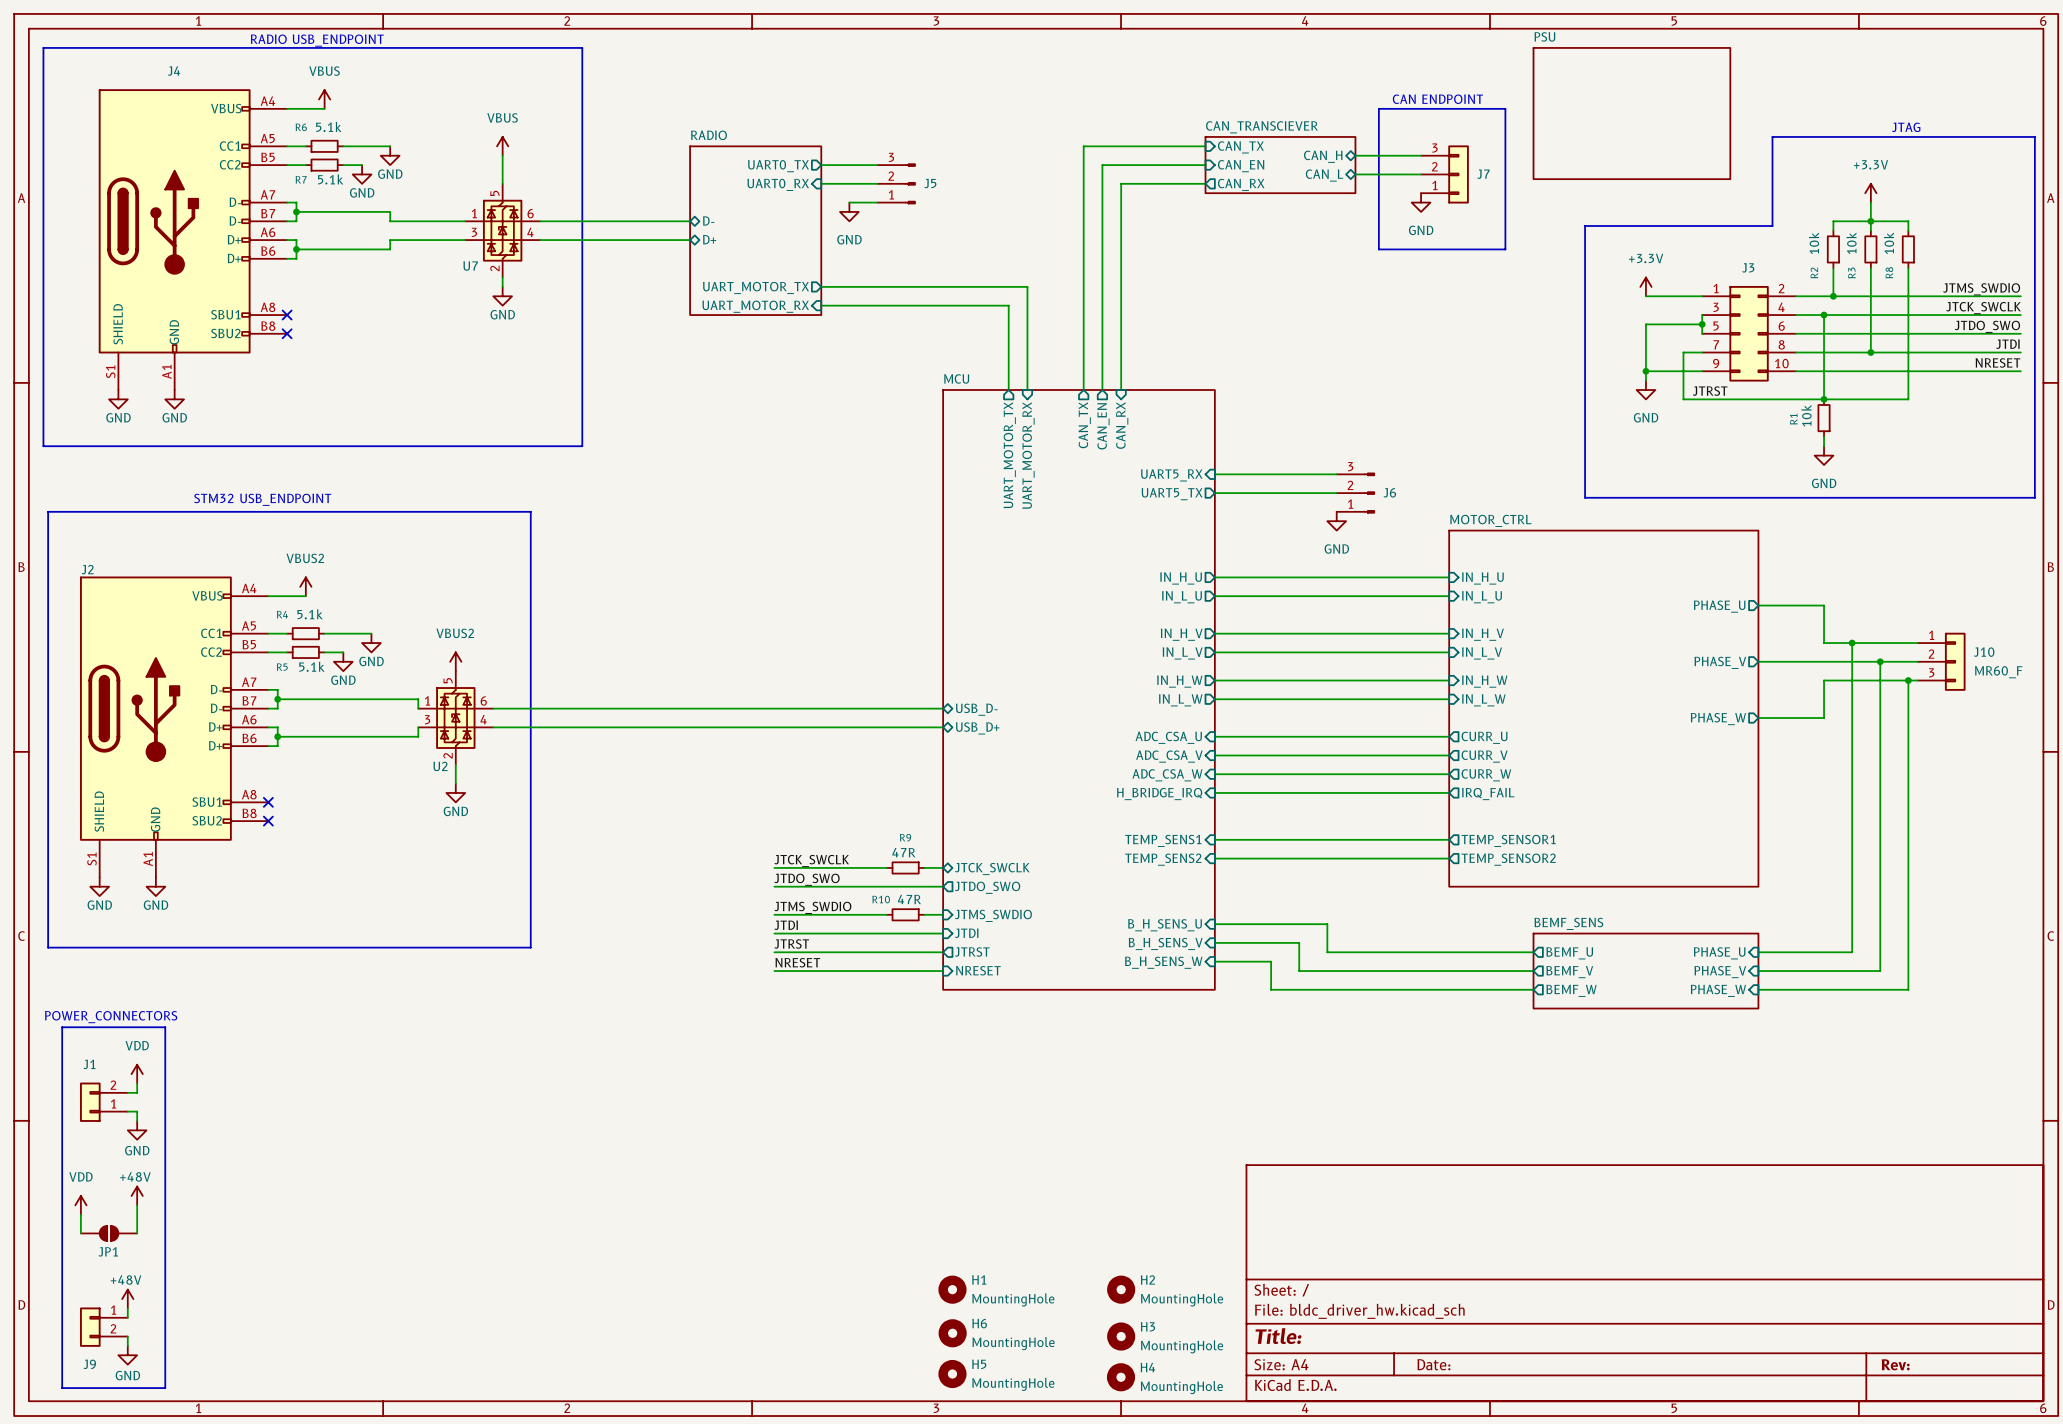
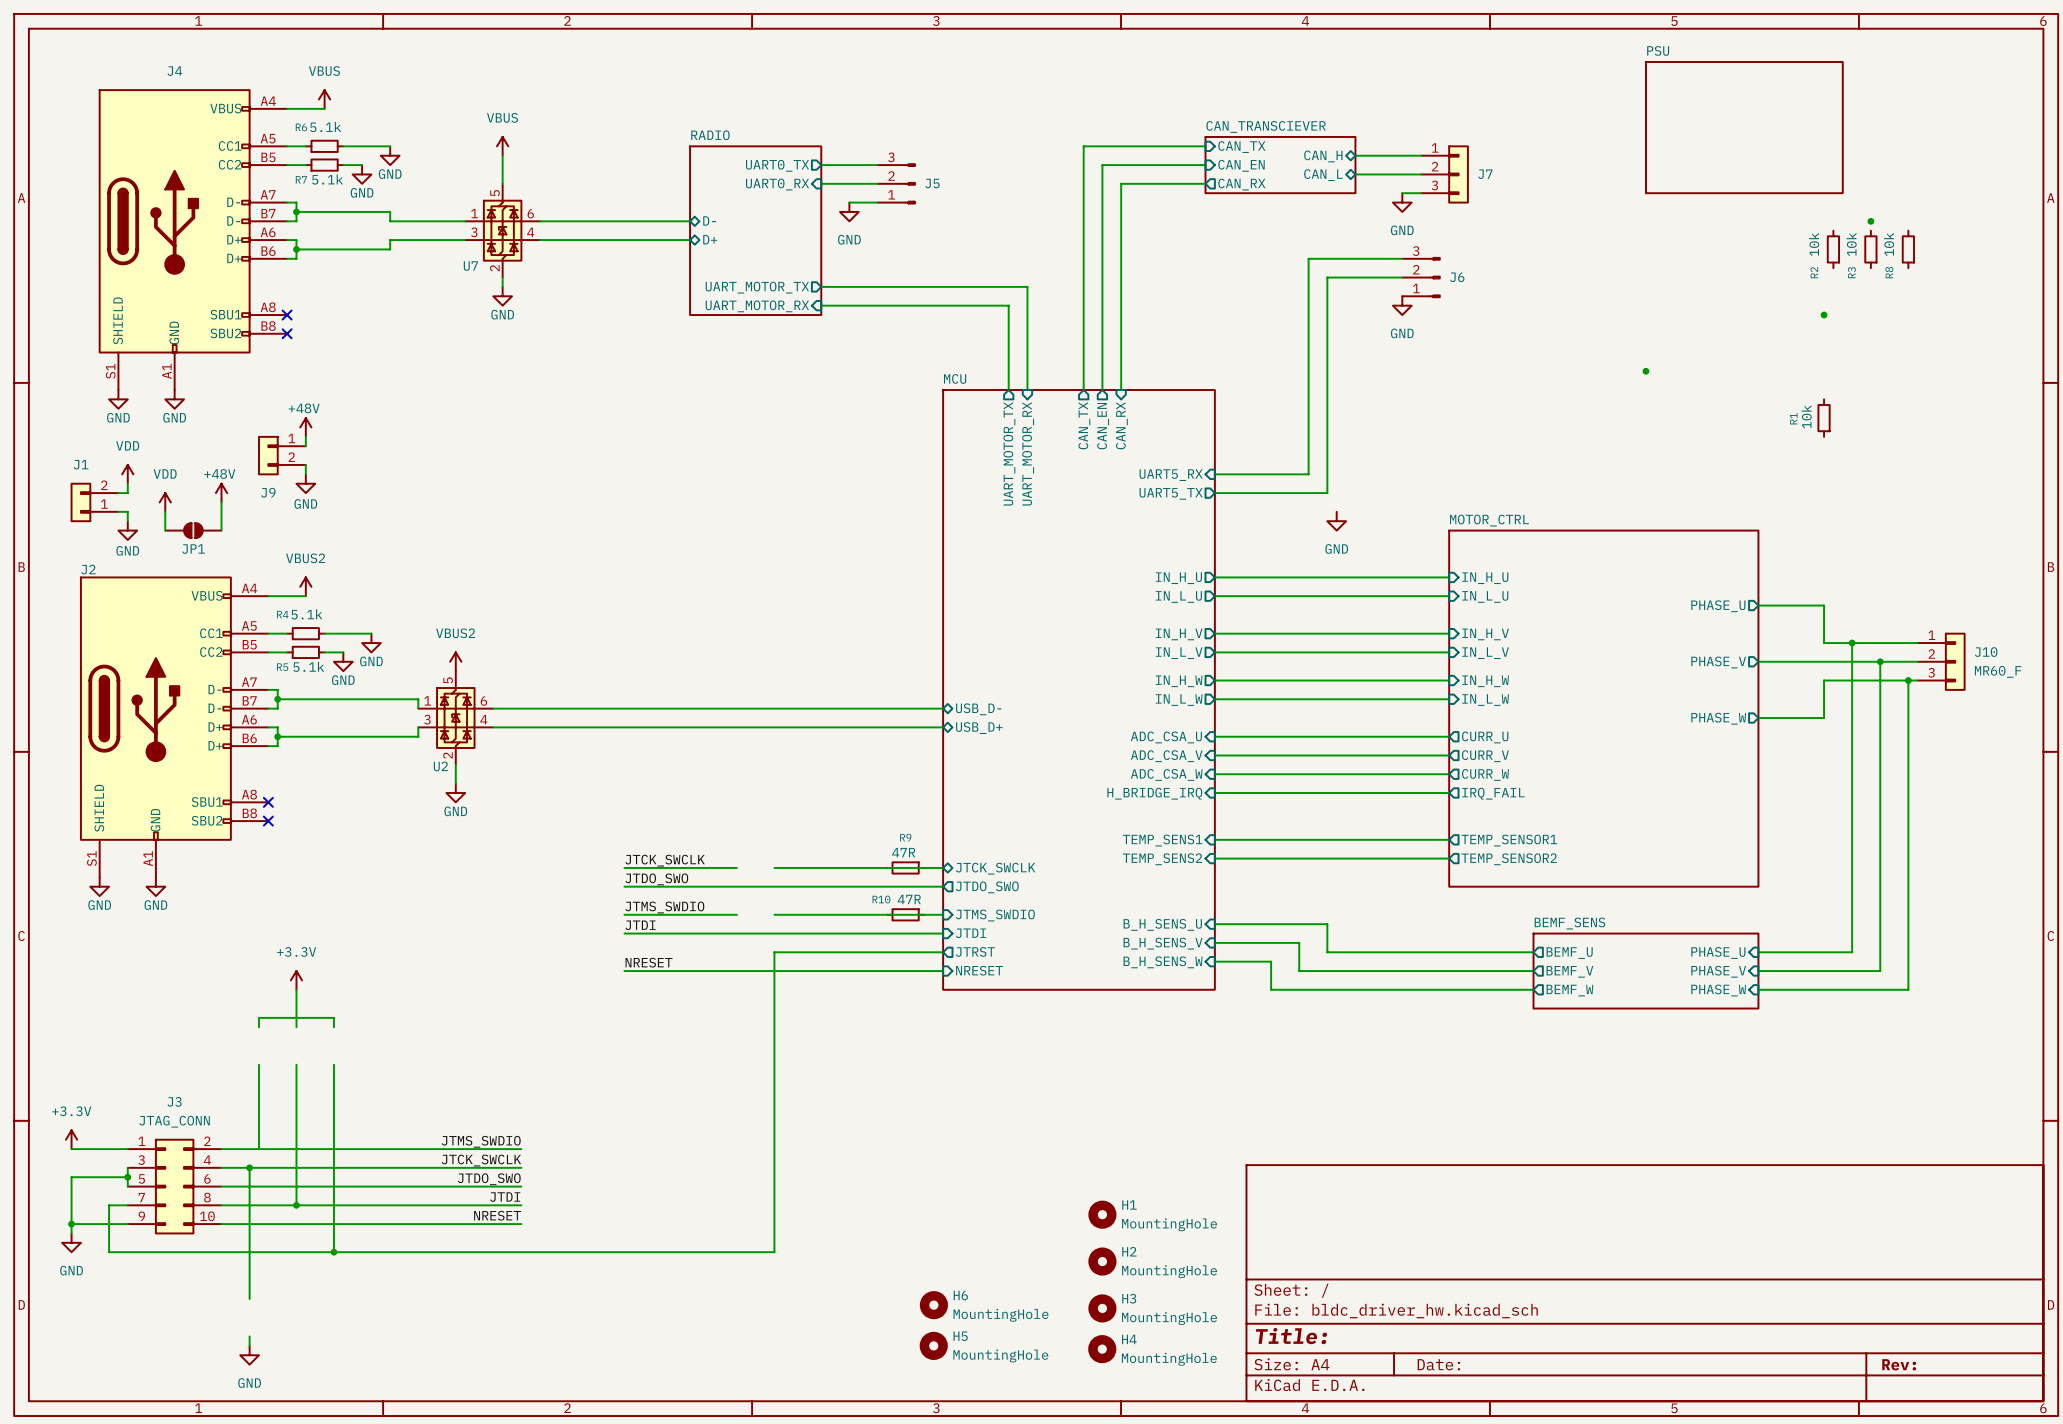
text: RADIO USB_ENDPOINT (317, 40) -> none
line: (43, 47) (43, 446) (582, 446) (582, 47) (43, 47) -> none
text: CAN ENDPOINT (1437, 99) -> none
line: (1378, 108) (1505, 108) (1505, 249) (1378, 249) (1378, 108) -> none
sheet PSU position: (1631, 113) -> (1744, 127)
text: JTAG (1906, 127) -> none
line: (1772, 136) (2034, 136) (2034, 497) (1585, 497) (1585, 226) (1772, 226) (1772, 136) -> none
J7 flip: as is (1458, 174) -> up-down (1458, 174)
wire: none -> (1402, 193) (1421, 193)
power symbol: +3.3V (1870, 193) -> none
power symbol position: GND (1421, 202) -> GND (1402, 202)
wire: (1870, 202) (1870, 230) -> none
wire: (1833, 230) (1833, 221) (1908, 221) (1908, 230) -> none
J3 name position: J3 (1748, 267) -> J3 (174, 1101)
wire: (1833, 268) (1833, 296) -> none
wire: (1870, 268) (1870, 352) -> none
wire: (1908, 268) (1908, 399) (1683, 399) (1683, 352) (1702, 352) -> none
power symbol: +3.3V (1645, 286) -> none
label: JTMS_SWDIO (1981, 289) -> none
wire: (1645, 296) (1702, 296) -> none
wire: (1795, 296) (2020, 296) -> none
junction: (1833, 296) -> none
power symbol: none -> GND (1402, 305)
label: JTCK_SWCLK (1983, 308) -> none
wire: (1702, 315) (1702, 333) -> none
wire: (1795, 315) (2020, 315) -> none
wire: (1824, 315) (1824, 399) -> none
wire: (1702, 324) (1645, 324) (1645, 380) -> none
junction: (1702, 324) -> none
label: JTDO_SWO (1987, 326) -> none
J3 position: (1749, 333) -> (174, 1186)
wire: (1795, 333) (2020, 333) -> none
label: JTDI (2007, 344) -> none
wire: (1795, 352) (2020, 352) -> none
junction: (1870, 352) -> none
label: NRESET (1997, 362) -> none
wire: (1645, 371) (1702, 371) -> none
wire: (1795, 371) (2020, 371) -> none
power symbol: GND (1645, 390) -> none
label: JTRST (1710, 391) -> none
junction: (1824, 399) -> none
power symbol: none -> +48V (305, 427)
wire: none -> (305, 436) (305, 446)
wire: (1824, 436) (1824, 446) -> none
power symbol: GND (1824, 455) -> none
wire: none -> (305, 464) (305, 474)
power symbol: none -> VDD (127, 474)
wire: (1308, 474) (1336, 474) -> (1308, 474) (1308, 258) (1402, 258)
wire: none -> (127, 483) (127, 493) (118, 493)
power symbol: none -> GND (305, 483)
power symbol: none -> +48V (221, 493)
wire: (1327, 493) (1336, 493) -> (1327, 493) (1327, 277) (1402, 277)
J6 position: (1355, 493) -> (1421, 277)
text: STM32 USB_ENDPOINT (262, 499) -> none
power symbol: none -> VDD (165, 502)
wire: none -> (221, 502) (221, 530)
line: (48, 511) (530, 511) (530, 947) (48, 947) (48, 511) -> none
wire: none -> (165, 511) (165, 530)
power symbol: none -> GND (127, 530)
label position: JTCK_SWCLK (811, 860) -> JTCK_SWCLK (665, 860)
wire: none -> (624, 867) (736, 867)
wire: none -> (886, 867) (924, 867)
label position: JTDO_SWO (807, 879) -> JTDO_SWO (656, 879)
wire: none -> (624, 886) (774, 886)
label position: JTMS_SWDIO (812, 907) -> JTMS_SWDIO (664, 907)
wire: none -> (624, 914) (736, 914)
wire: none -> (886, 914) (924, 914)
label position: JTDI (786, 925) -> JTDI (640, 925)
wire: none -> (624, 933) (774, 933)
label: JTRST (791, 943) -> none
wire: none -> (774, 952) (774, 1252) (109, 1252) (109, 1205) (127, 1205)
label position: NRESET (797, 962) -> NRESET (649, 962)
wire: none -> (624, 971) (774, 971)
power symbol: none -> +3.3V (296, 980)
wire: none -> (296, 989) (296, 1027)
text: POWER_CONNECTORS (111, 1017) -> none
line: (62, 1027) (165, 1027) (165, 1388) (62, 1388) (62, 1027) -> none
wire: none -> (258, 1027) (258, 1017) (333, 1017) (333, 1027)
wire: none -> (258, 1064) (258, 1149)
wire: none -> (296, 1064) (296, 1205)
wire: none -> (333, 1064) (333, 1252)
power symbol: VDD (137, 1074) -> none
wire: (137, 1083) (137, 1092) (127, 1092) -> none
J1 position: (103, 1102) -> (94, 502)
wire: (127, 1111) (137, 1111) (137, 1120) -> none
J3 value: none -> JTAG_CONN (174, 1121)
power symbol: GND (137, 1130) -> none
power symbol: none -> +3.3V (71, 1139)
label: none -> JTMS_SWDIO (481, 1141)
wire: none -> (71, 1149) (127, 1149)
wire: none -> (221, 1149) (521, 1149)
label: none -> JTCK_SWCLK (481, 1160)
wire: none -> (221, 1167) (521, 1167)
wire: none -> (249, 1167) (249, 1299)
junction: none -> (249, 1167)
wire: none -> (127, 1177) (71, 1177) (71, 1233)
junction: none -> (127, 1177)
label: none -> JTDO_SWO (489, 1179)
wire: none -> (221, 1186) (521, 1186)
power symbol: +48V (137, 1195) -> none
label: none -> JTDI (505, 1197)
power symbol: VDD (80, 1205) -> none
wire: (137, 1205) (137, 1233) -> none
wire: none -> (221, 1205) (521, 1205)
junction: none -> (296, 1205)
wire: (80, 1214) (80, 1233) -> (127, 1167) (127, 1186)
label: none -> NRESET (497, 1215)
wire: none -> (71, 1224) (127, 1224)
junction: none -> (71, 1224)
wire: none -> (221, 1224) (521, 1224)
JP1 position: (109, 1233) -> (193, 530)
power symbol: none -> GND (71, 1242)
junction: none -> (333, 1252)
H1 position: (952, 1289) -> (1102, 1214)
H2 position: (1121, 1289) -> (1102, 1261)
power symbol: +48V (127, 1299) -> none
wire: (127, 1308) (127, 1317) -> none
J9 position: (103, 1327) -> (281, 455)
H6 position: (952, 1333) -> (933, 1305)
wire: (127, 1336) (127, 1345) -> (249, 1336) (249, 1345)
H3 position: (1121, 1336) -> (1102, 1308)
power symbol: GND (127, 1355) -> none
power symbol: none -> GND (249, 1355)
H5 position: (952, 1374) -> (933, 1345)
H4 position: (1121, 1377) -> (1102, 1349)

